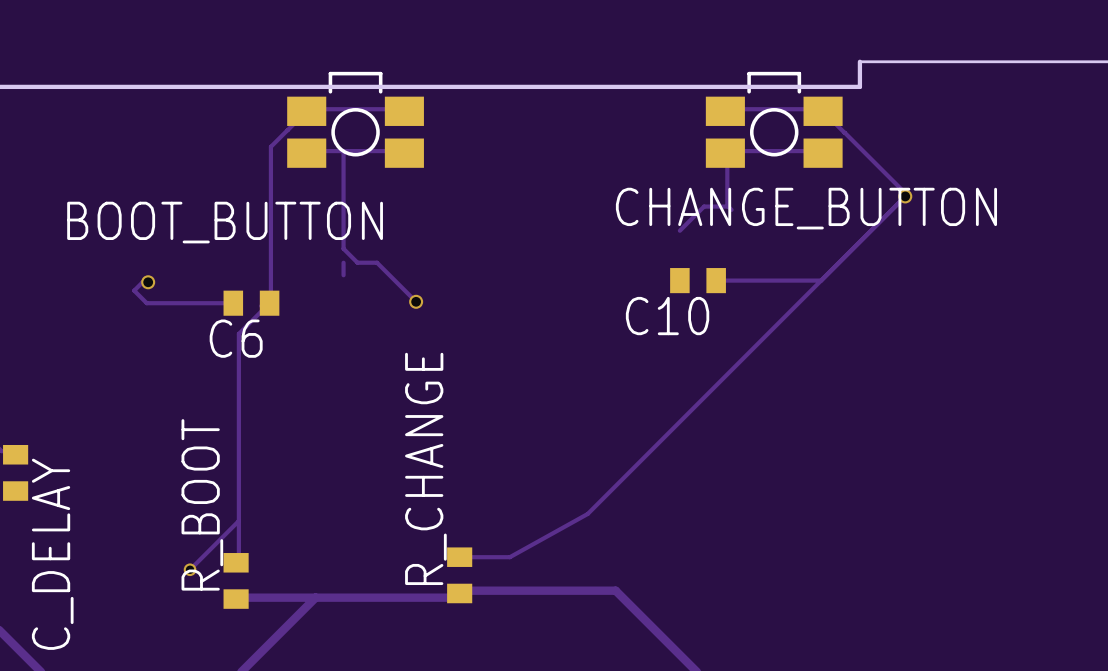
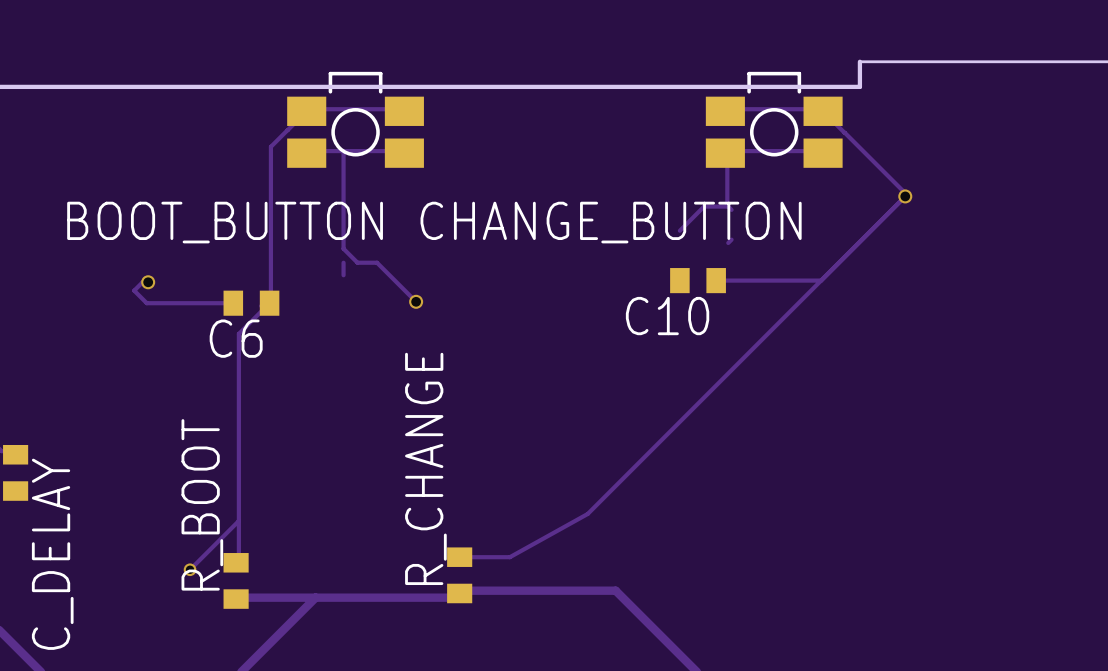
CHANGE_BUTTON name position: CHANGE_BUTTON (806, 208) -> CHANGE_BUTTON (611, 222)
track: none -> (731, 239) (728, 242)

